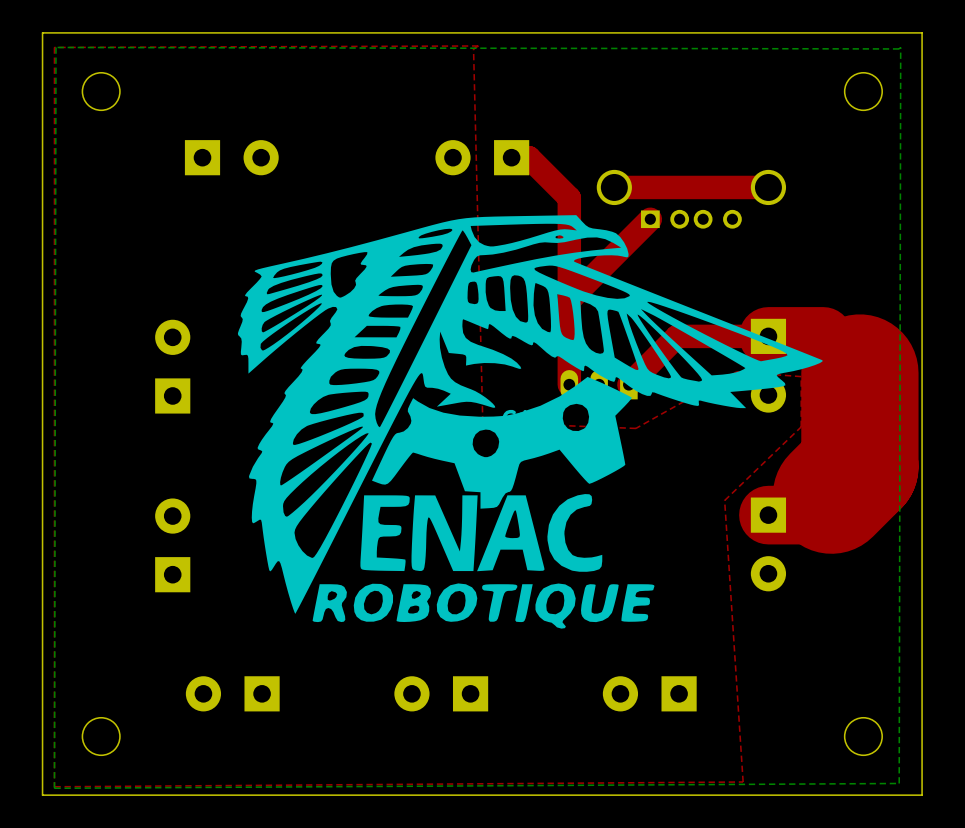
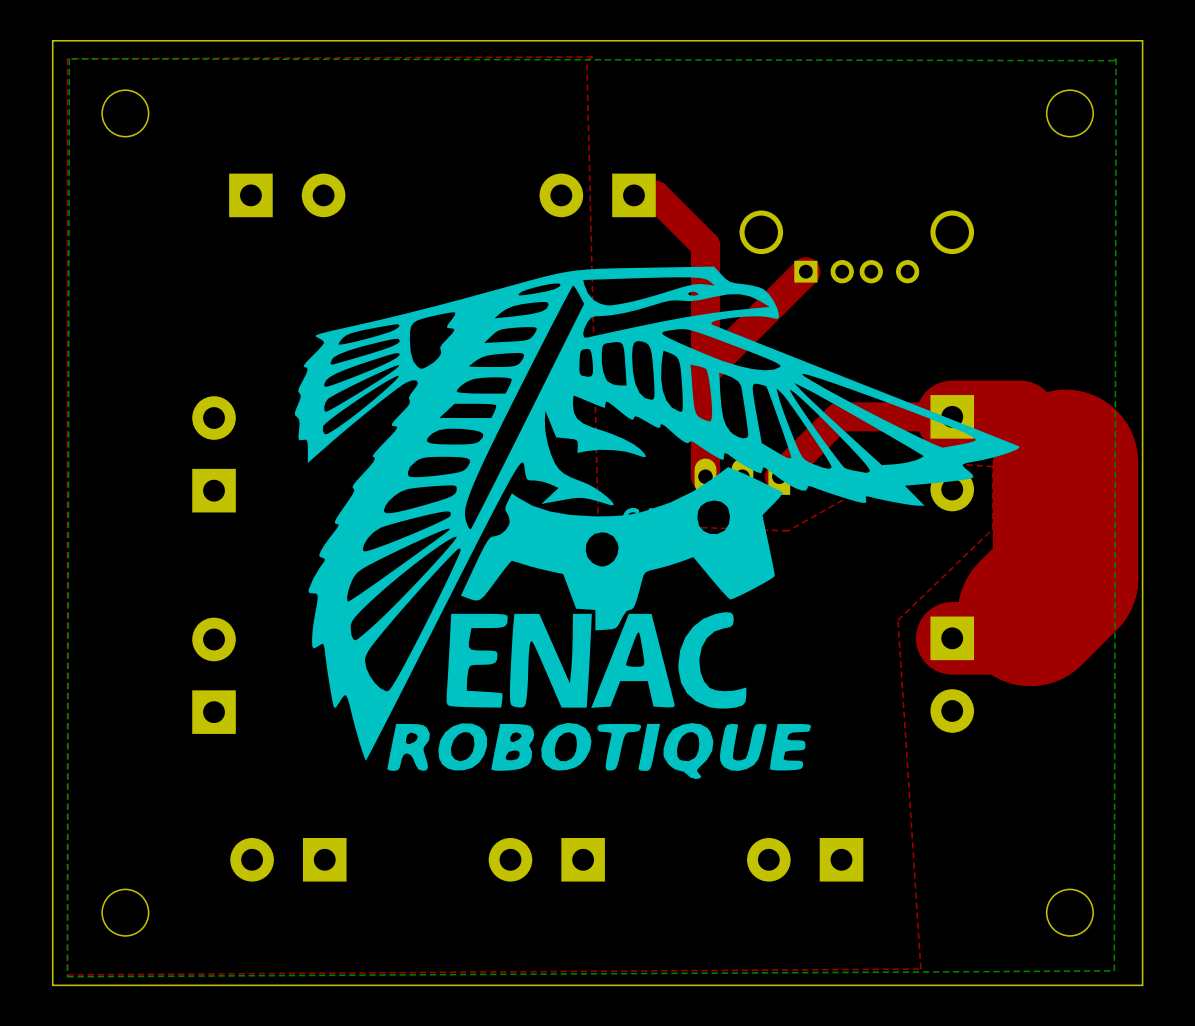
top track: (768, 187) (614, 187) -> none

